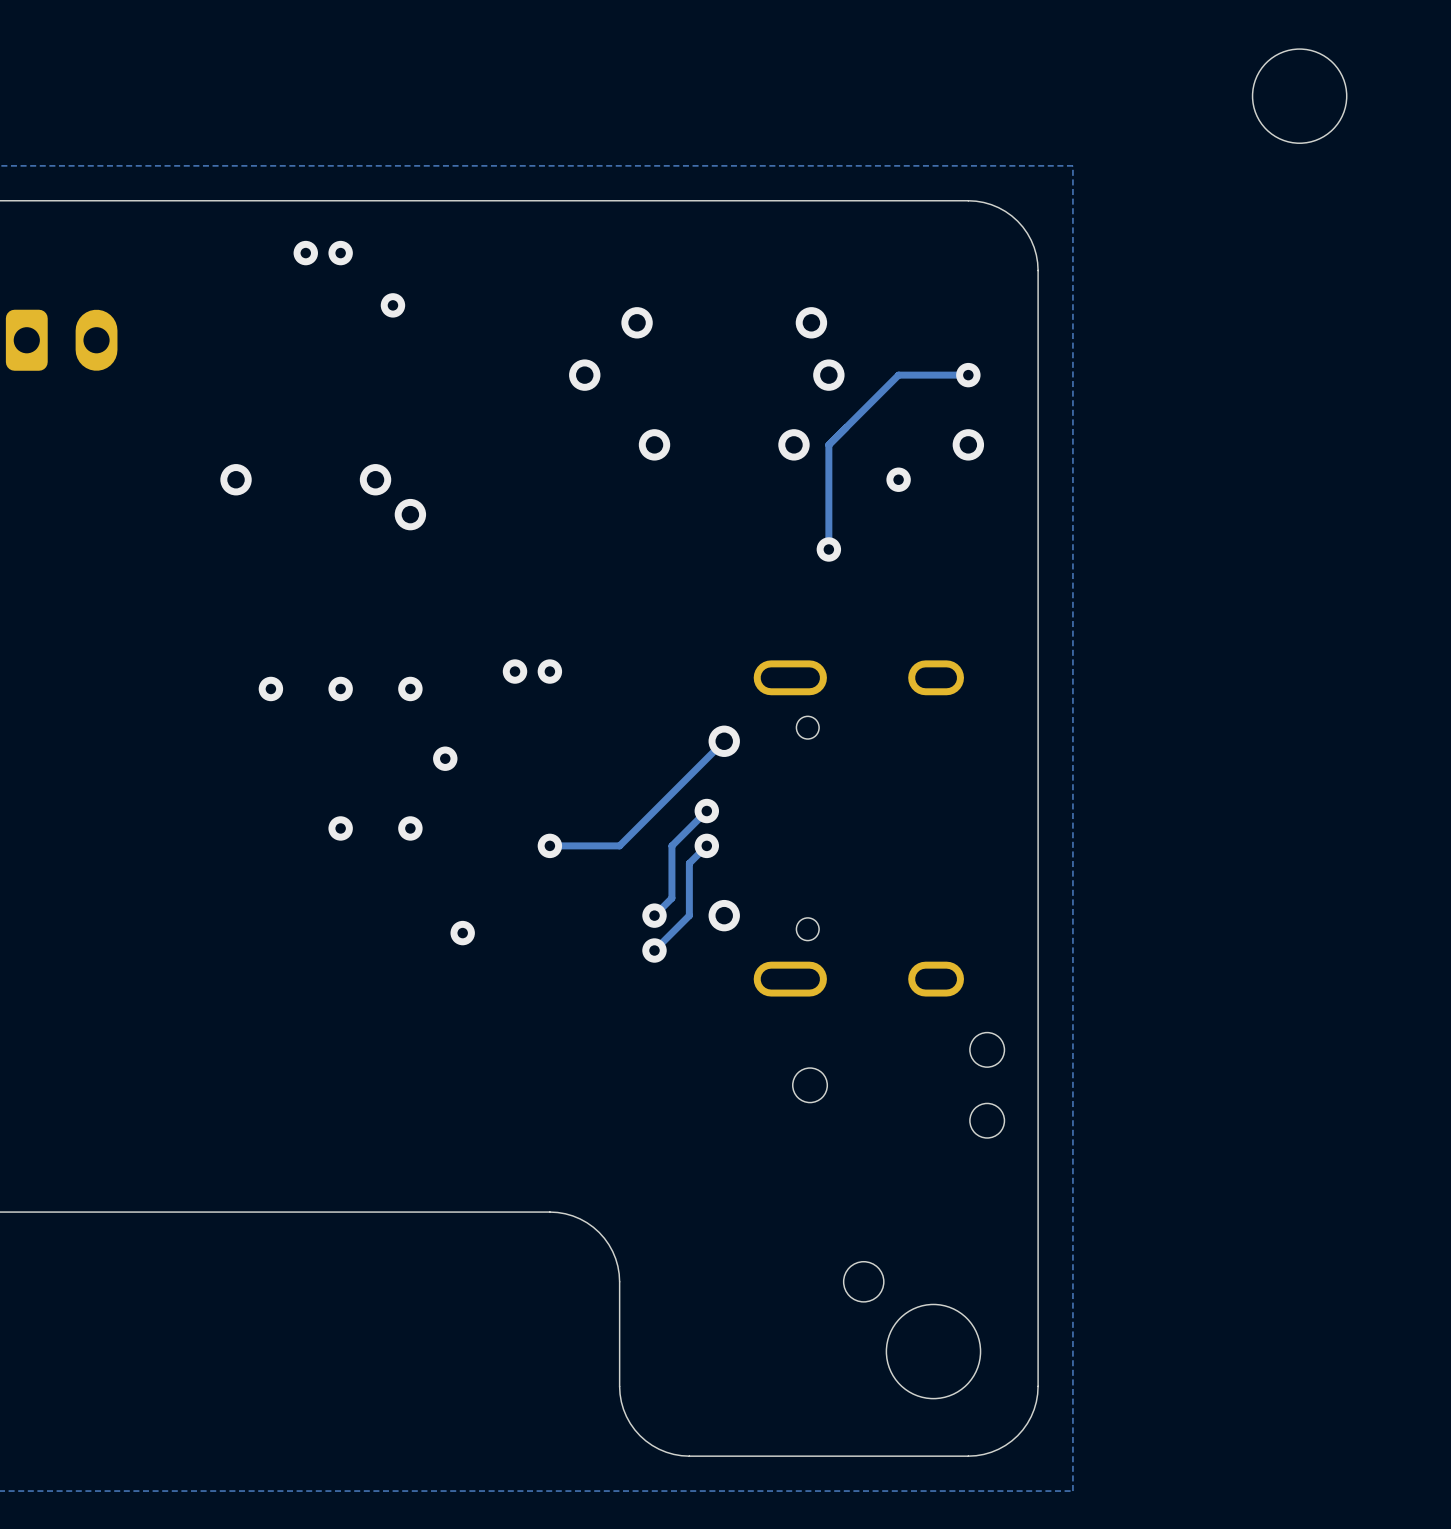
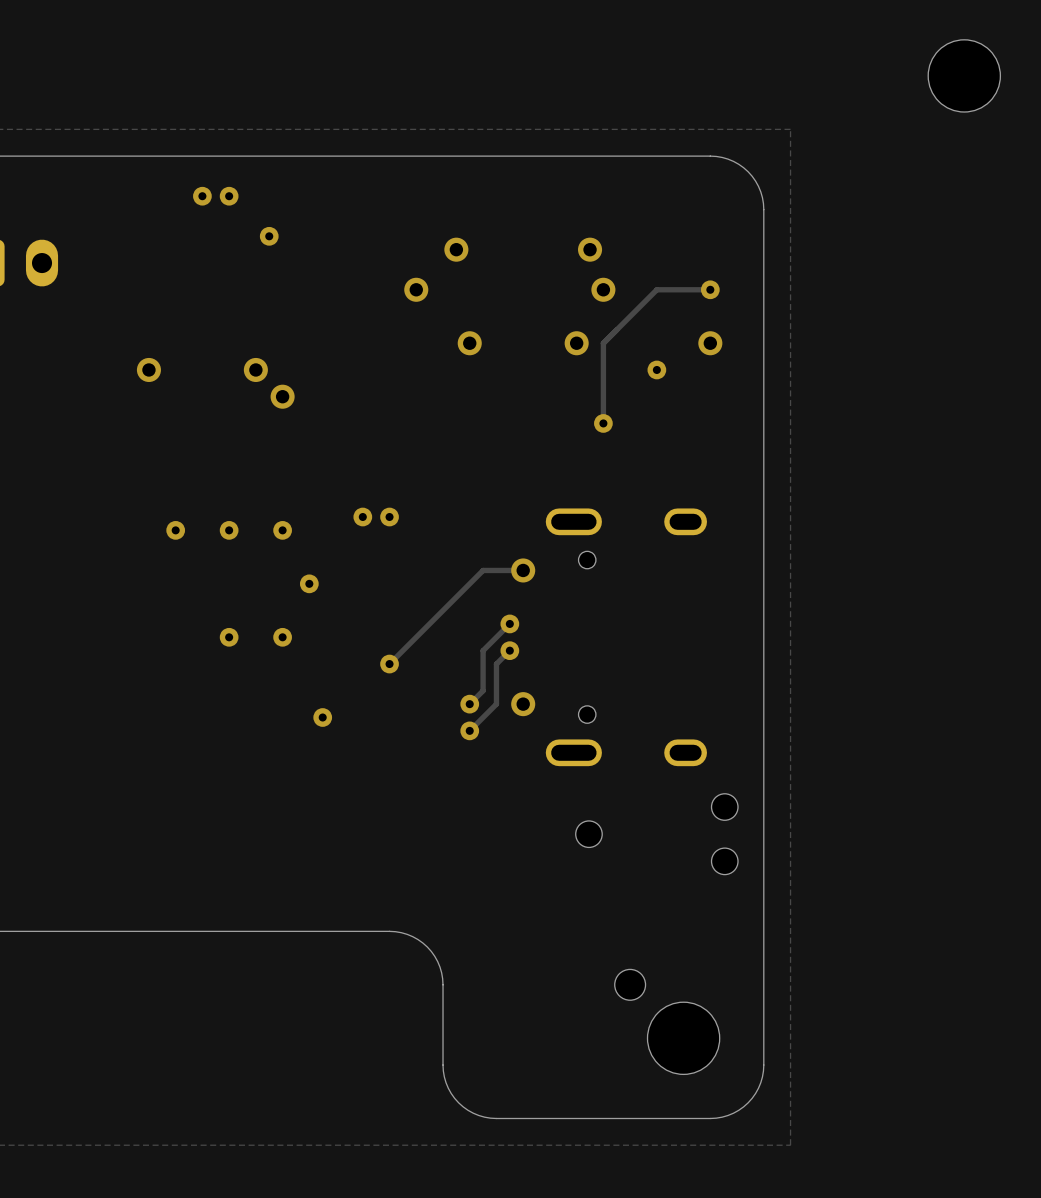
track: (724, 741) (619, 845) (549, 845) -> (523, 570) (483, 570) (389, 664)
via position: (549, 845) -> (389, 664)

